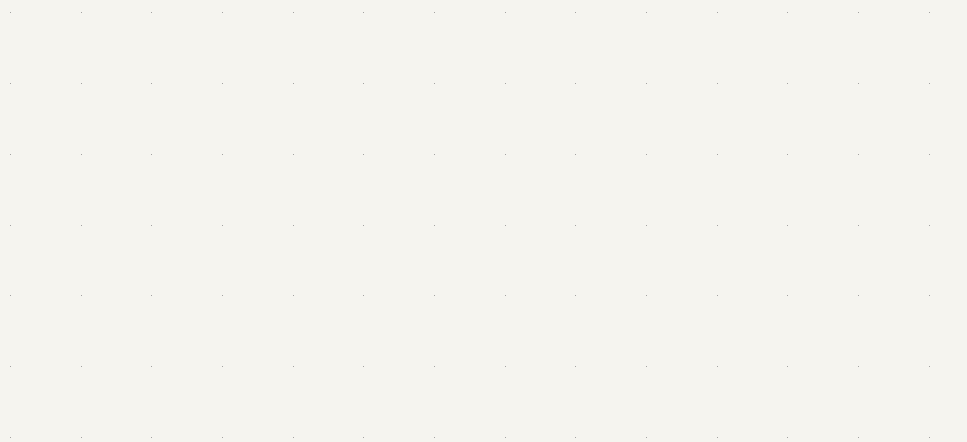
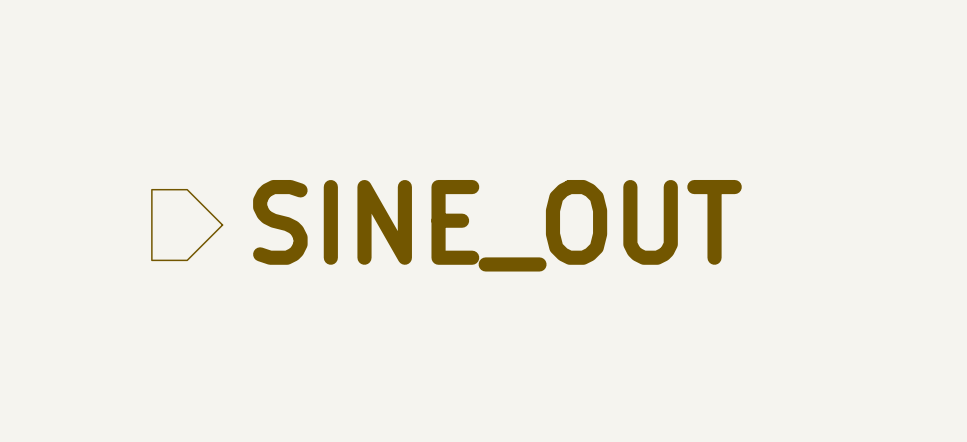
hierarchical label: none -> SINE_OUT (497, 225)

